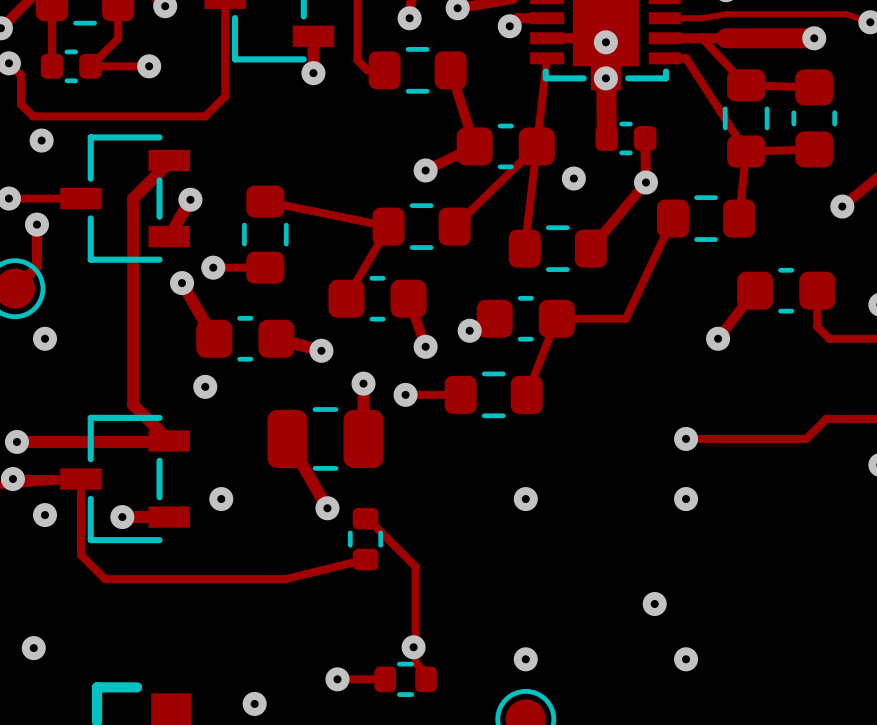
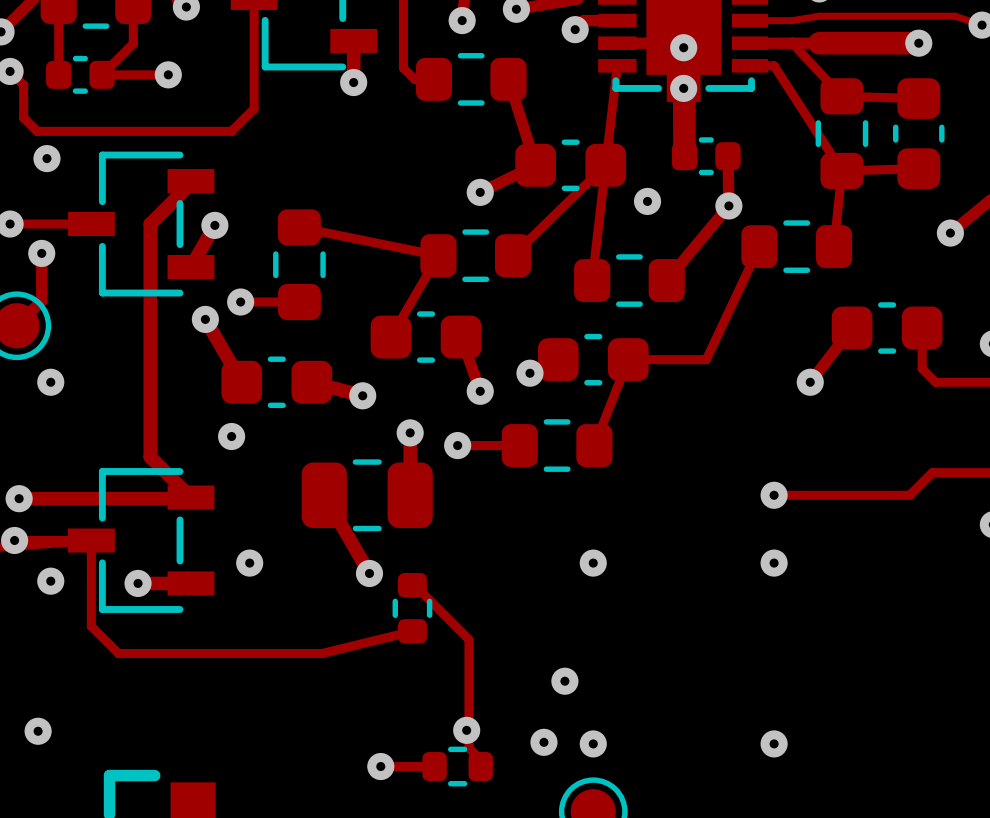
via: none -> (564, 681)
via: (654, 604) -> none
via: none -> (543, 742)
via: (254, 703) -> none

